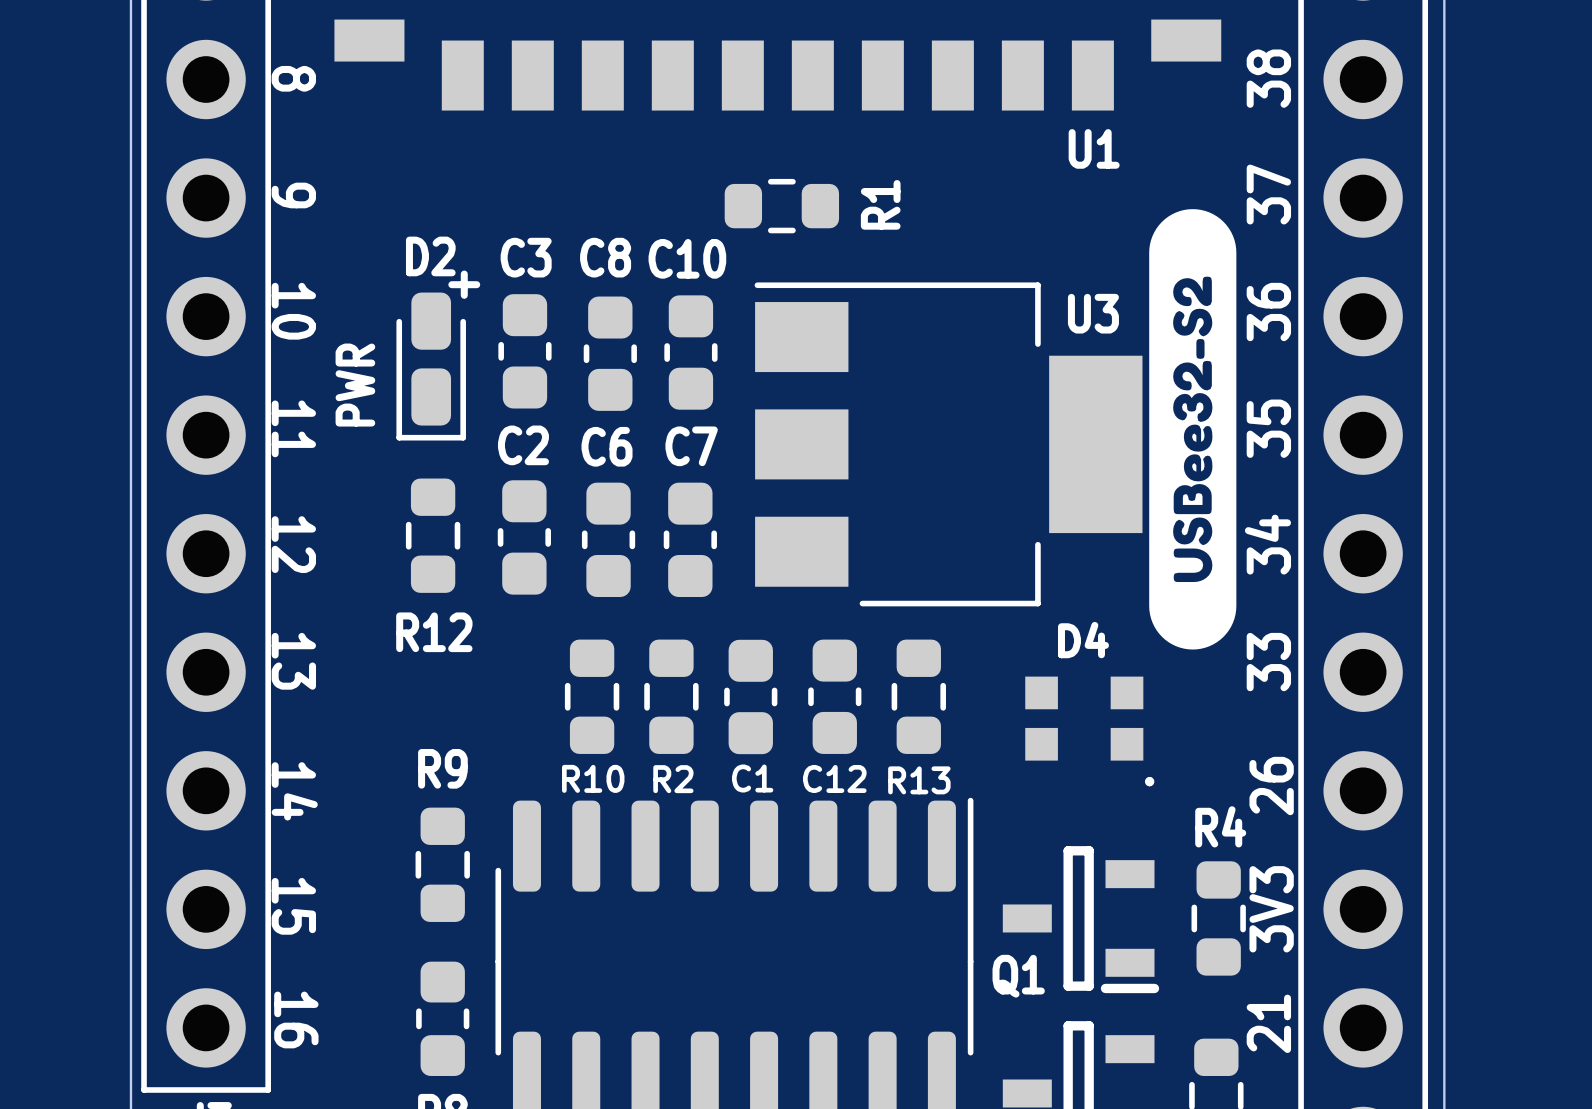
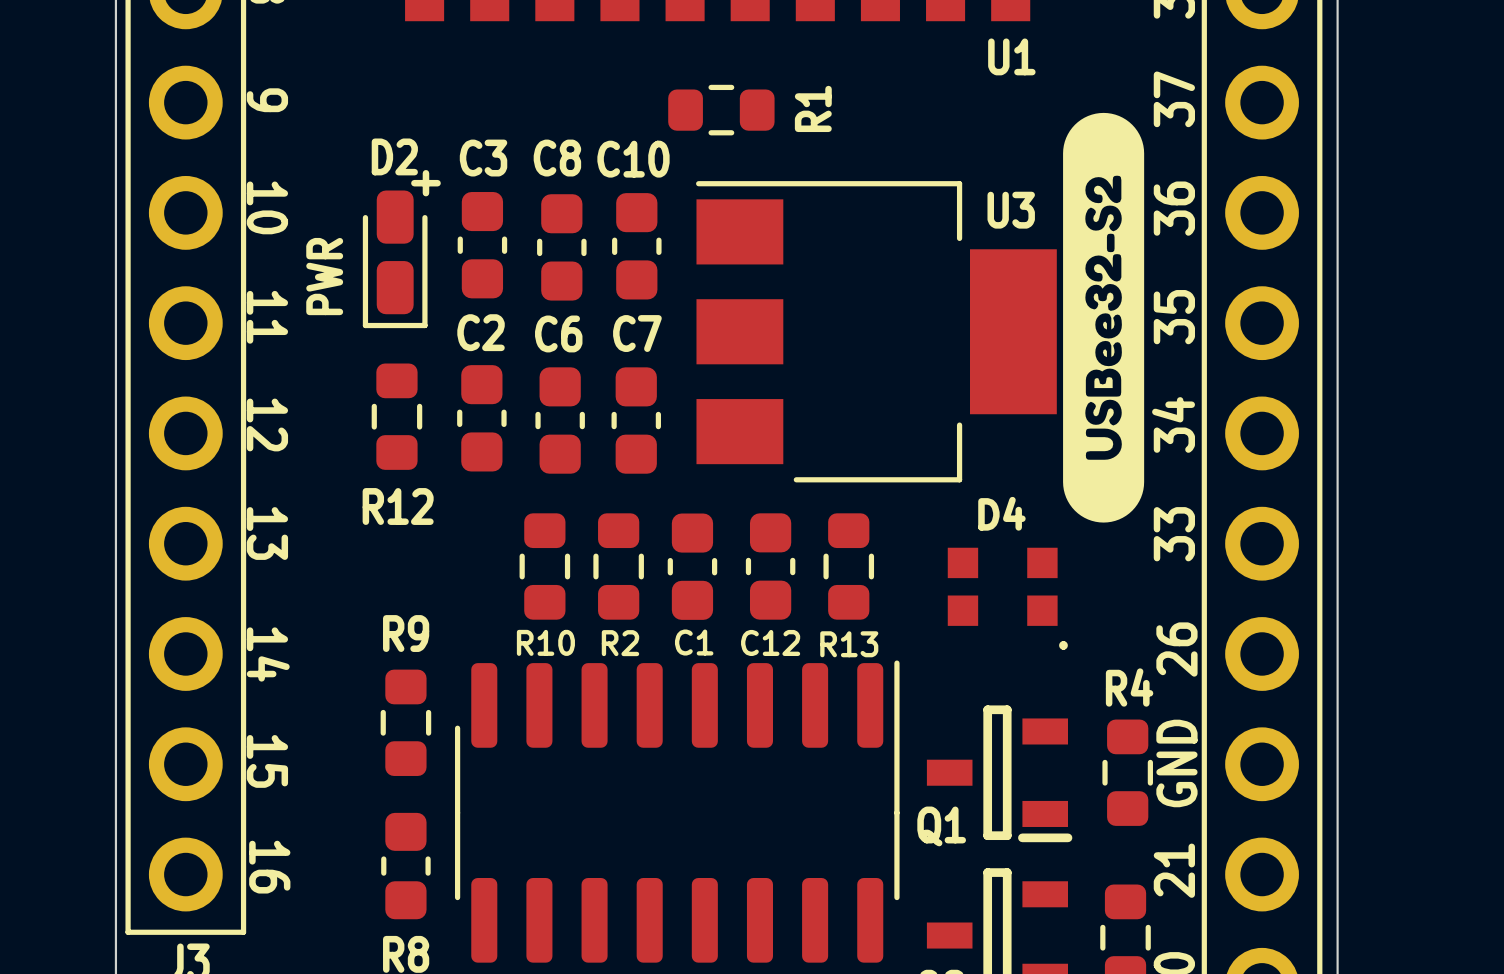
text: 3V3 (1271, 909) -> GND (1176, 763)

